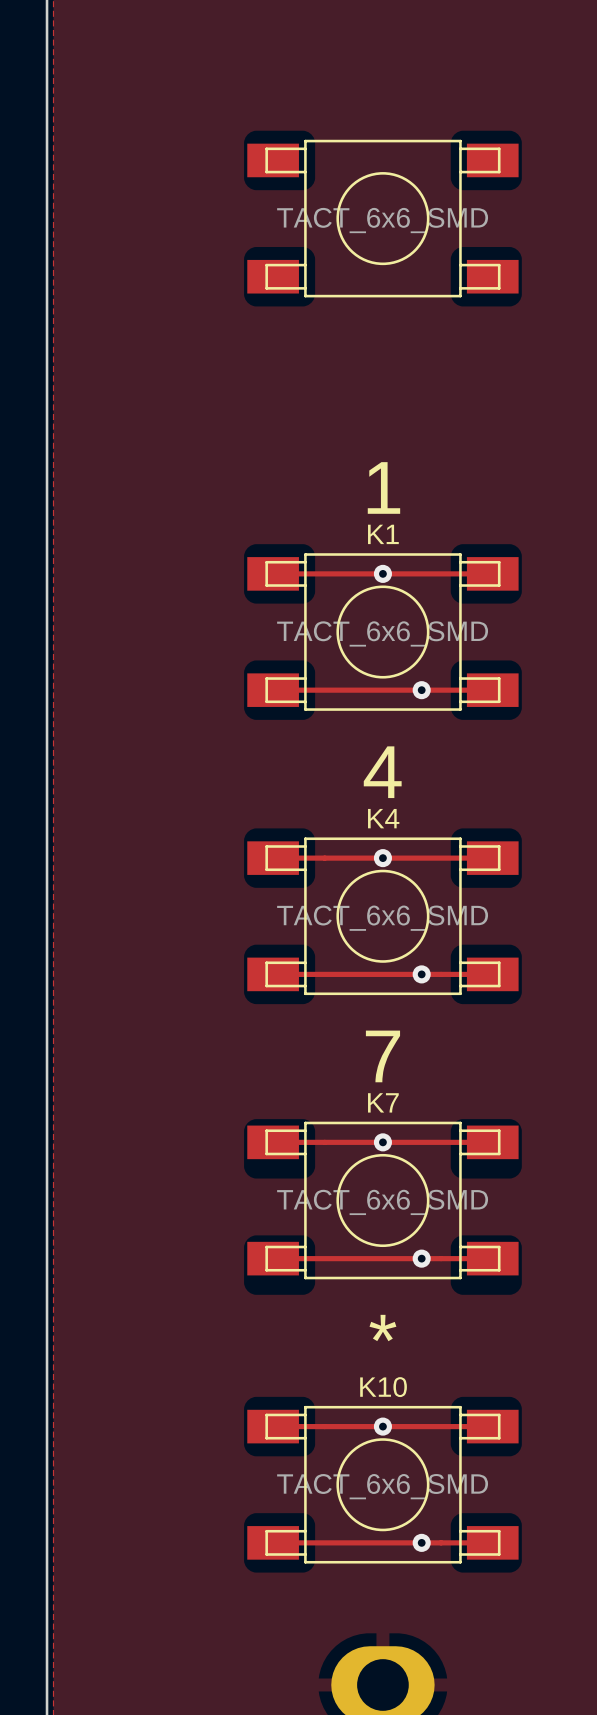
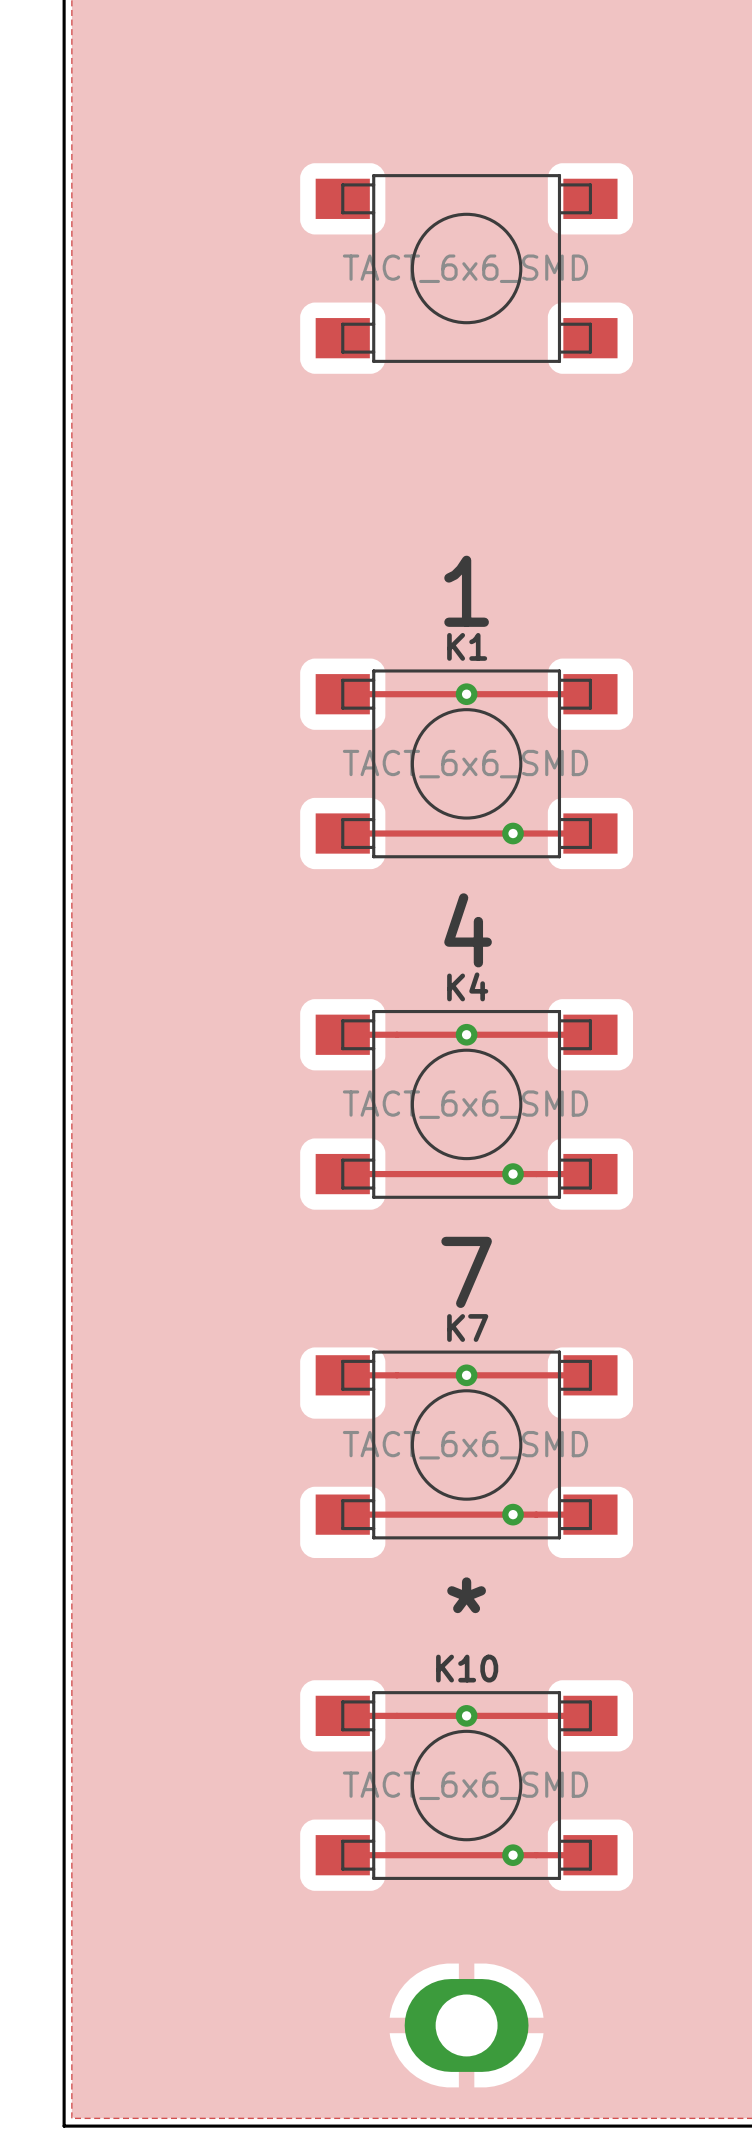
part footprint: [247, 139, 519, 298] -> [315, 174, 618, 363]
K1 footprint: [247, 553, 519, 711] -> [315, 669, 618, 859]
K4 footprint: [247, 837, 519, 996] -> [315, 1009, 618, 1199]
K7 footprint: [247, 1121, 519, 1280] -> [315, 1350, 618, 1540]
K10 footprint: [247, 1405, 519, 1564] -> [315, 1691, 618, 1880]

